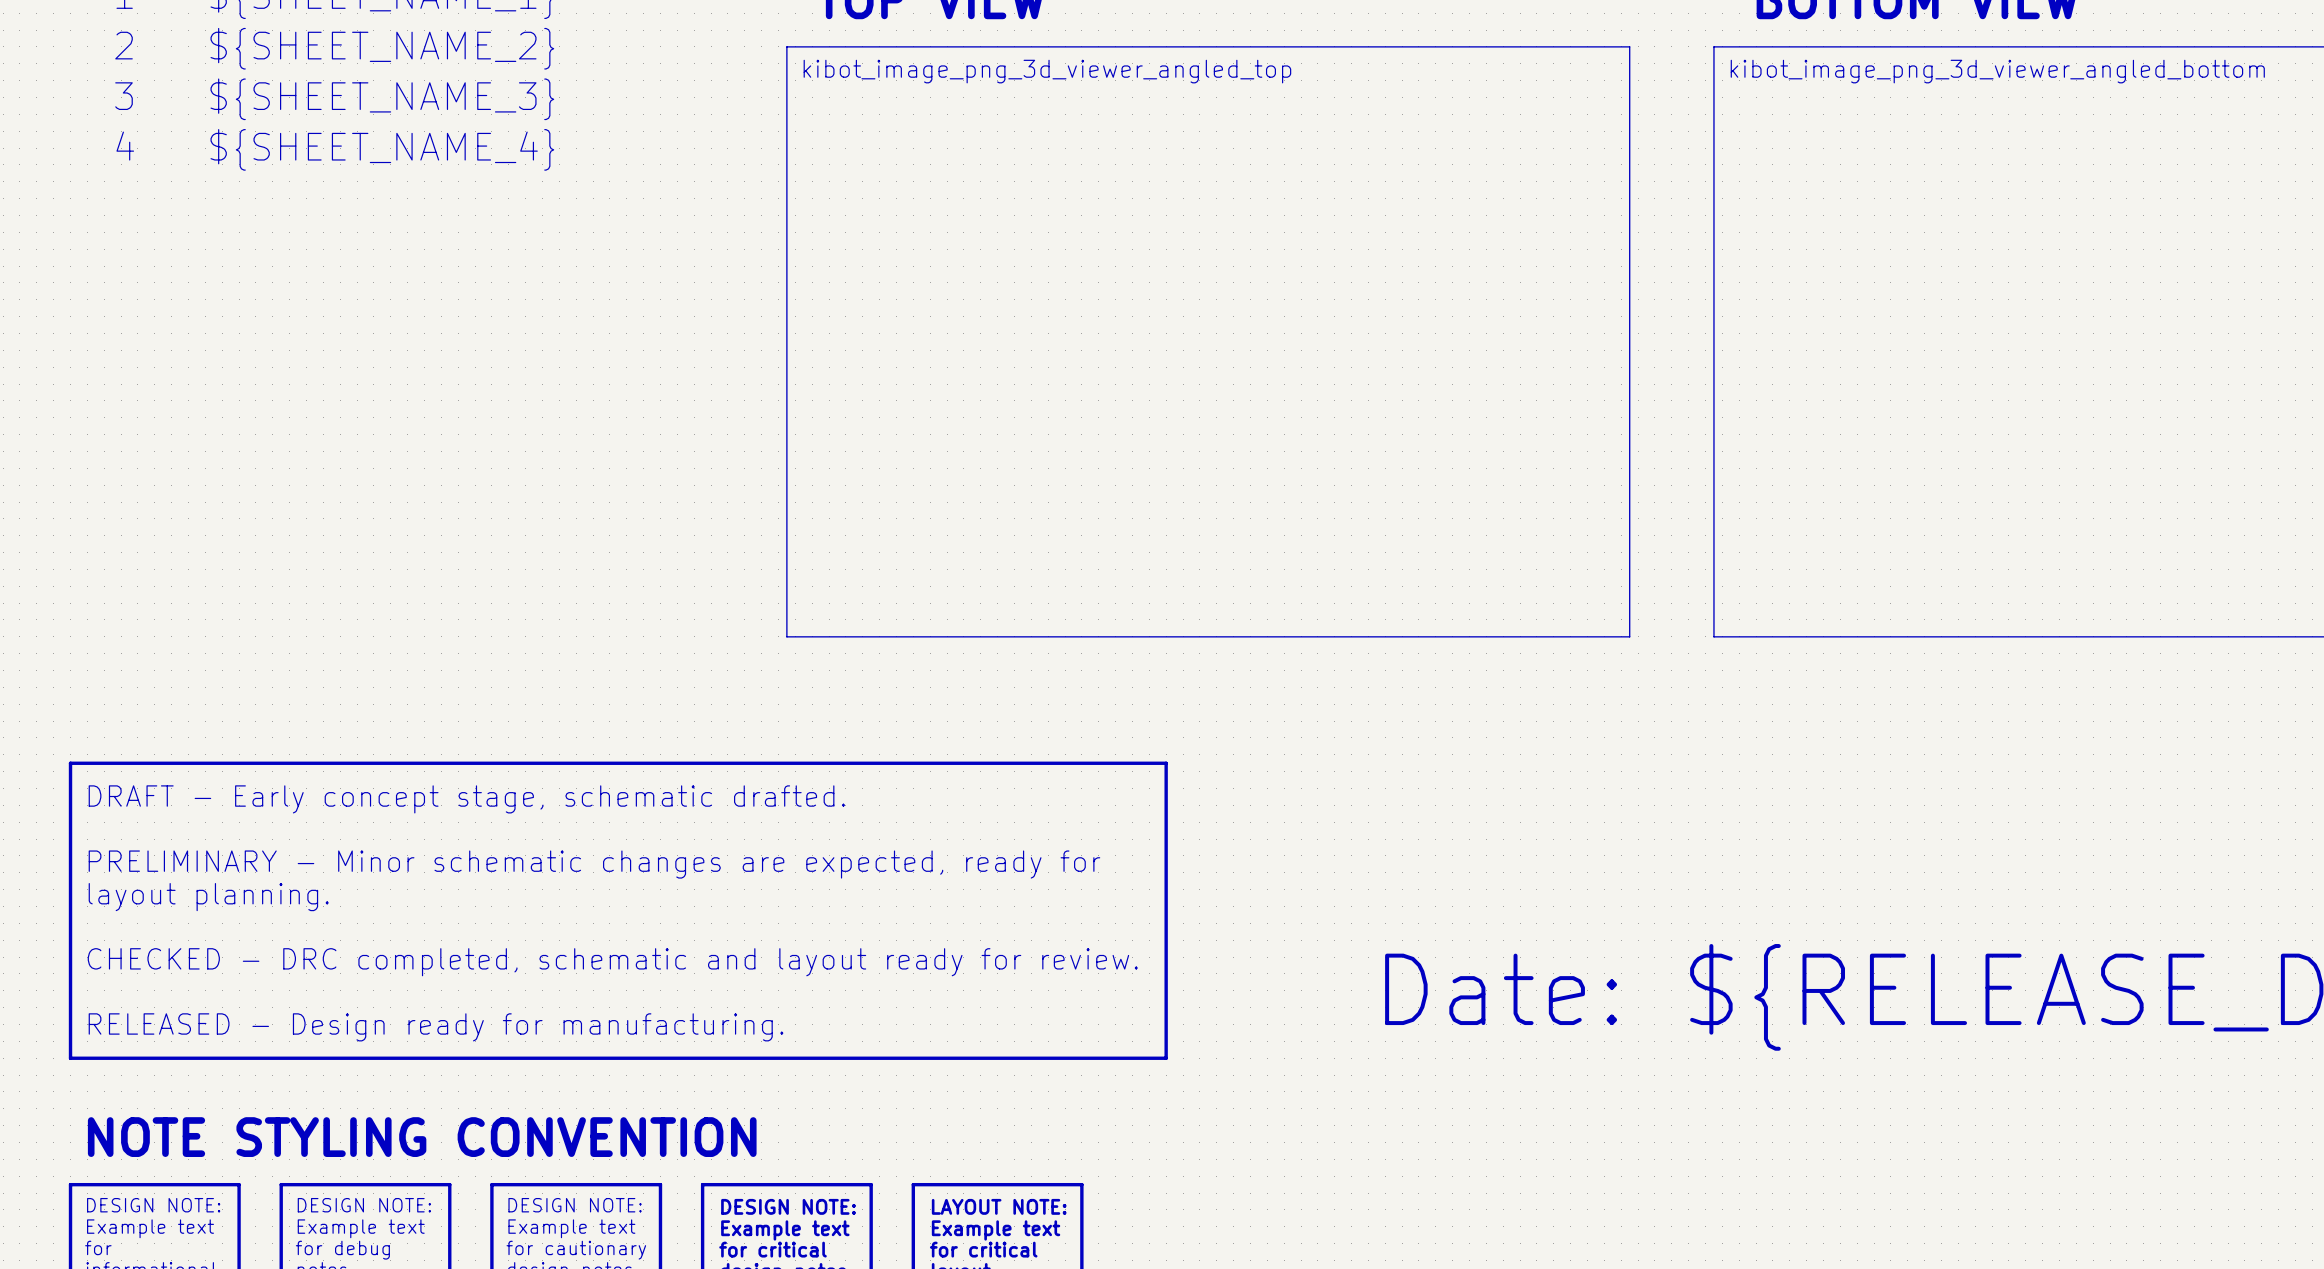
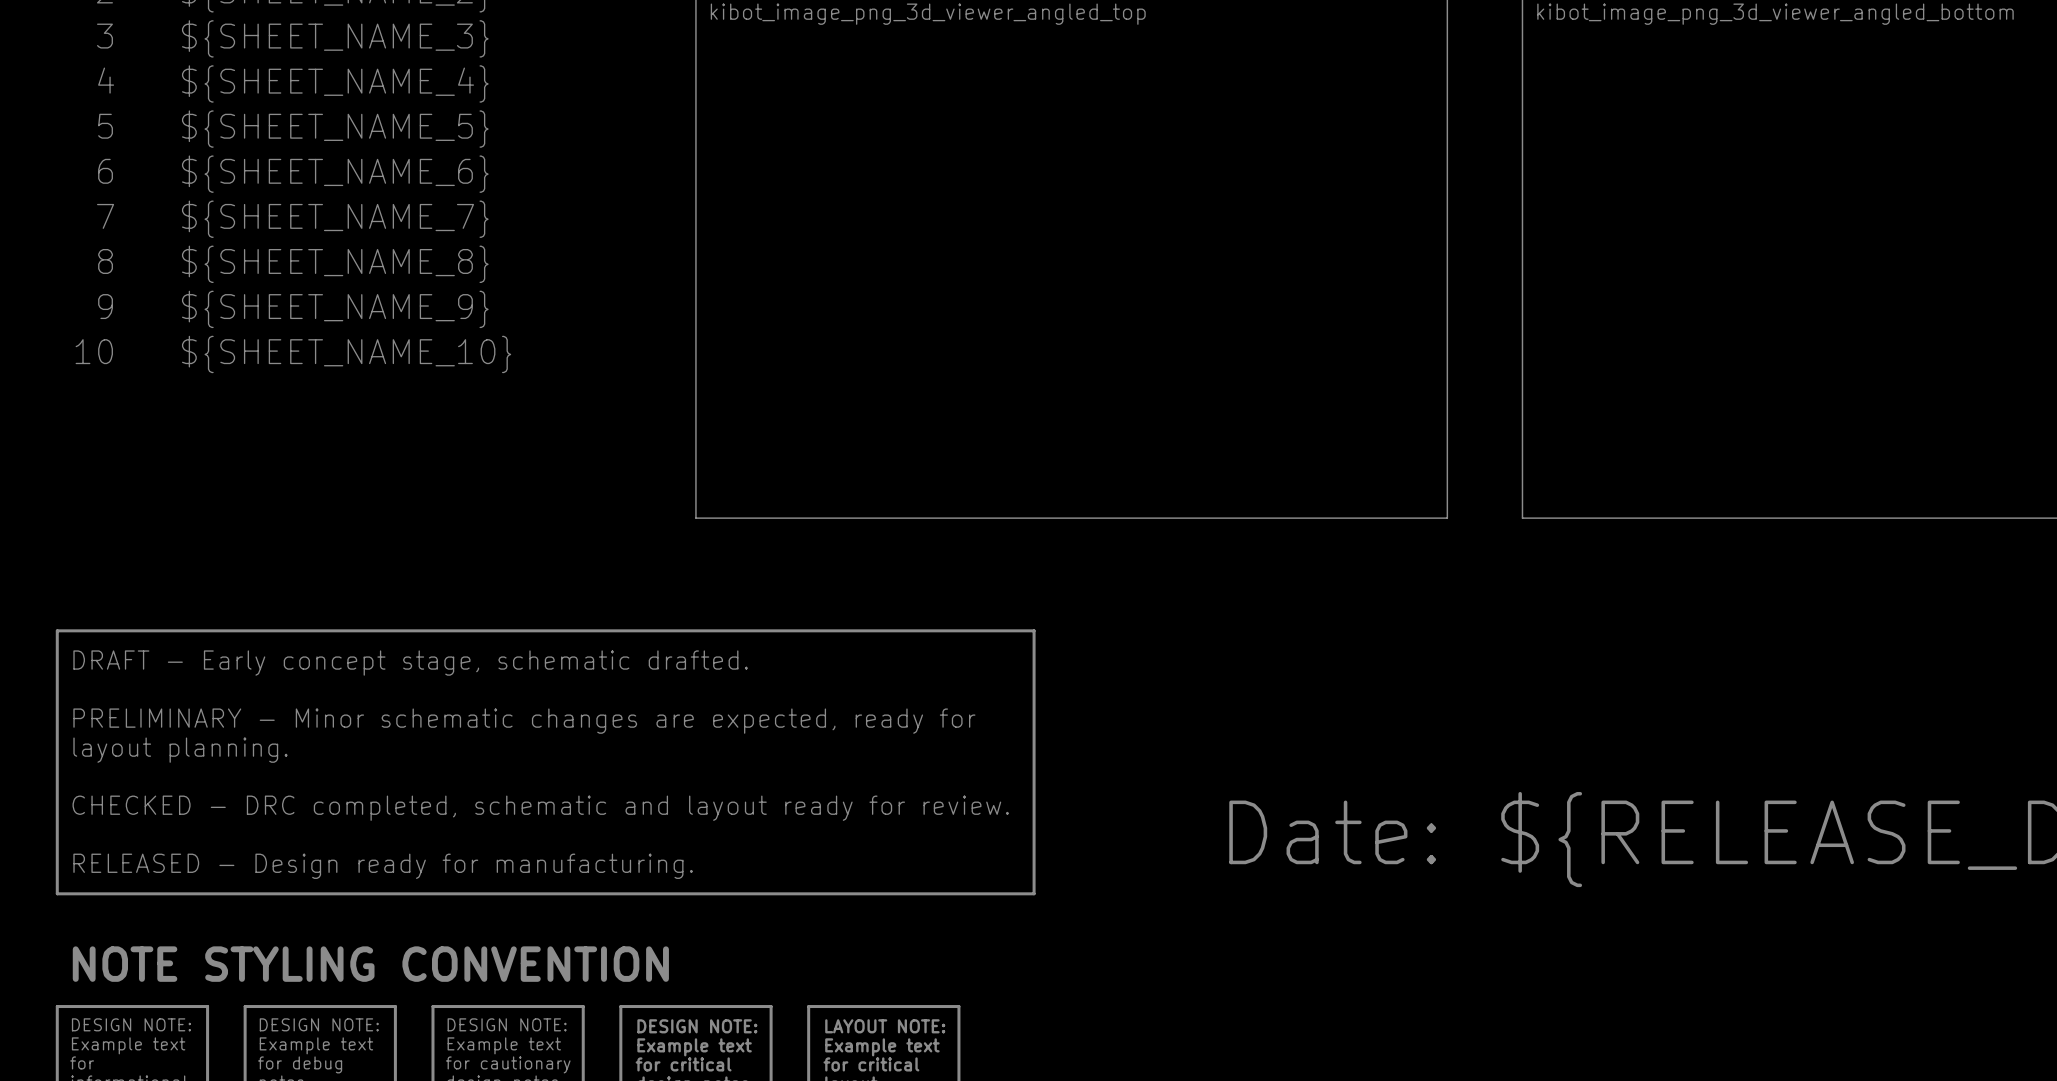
text: none -> 5 (105, 126)
text: none -> ${SHEET_NAME_5} (335, 129)
text: none -> 6 (105, 171)
text: none -> ${SHEET_NAME_6} (335, 174)
text: none -> 7 (105, 216)
text: none -> ${SHEET_NAME_7} (335, 219)
text: none -> 8 (105, 261)
text: none -> ${SHEET_NAME_8} (335, 264)
text: none -> 9 (105, 306)
text: none -> ${SHEET_NAME_9} (335, 309)
text: none -> 10 (94, 351)
text: none -> ${SHEET_NAME_10} (346, 354)

